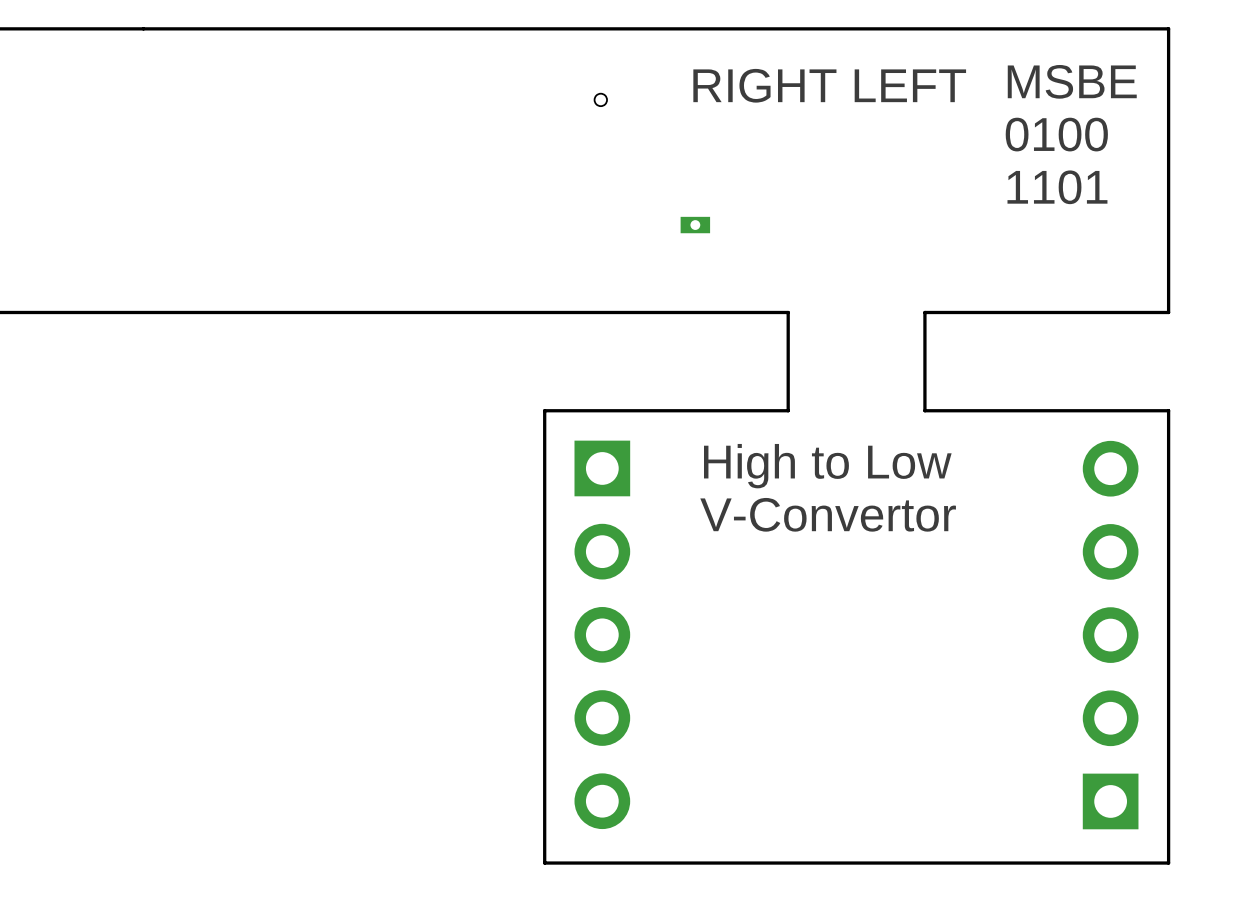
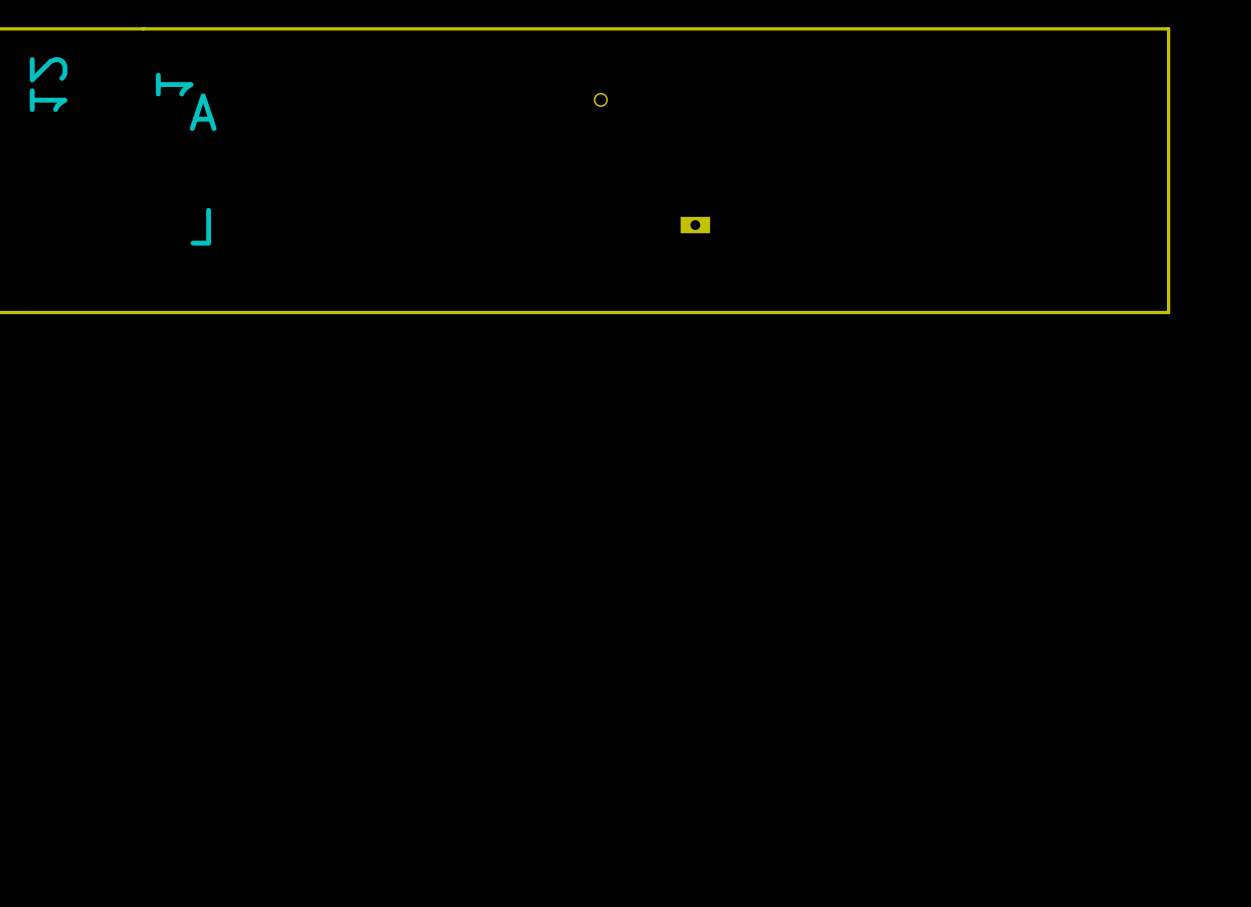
text: MSBE (1072, 81) -> none
text: RIGHT LEFT (829, 85) -> none
text: 0100 (1056, 134) -> none
part: none -> (123, 151)
text: 1101 (1057, 187) -> none
board edge: (924, 312) (924, 410) (1168, 410) (1168, 863) (544, 863) (544, 410) (788, 410) (788, 312) -> (924, 312) (788, 312)
text: High to Low (827, 466) -> none
text: V-Convertor (828, 514) -> none
part: (602, 634) -> none
part: (1110, 635) -> none

